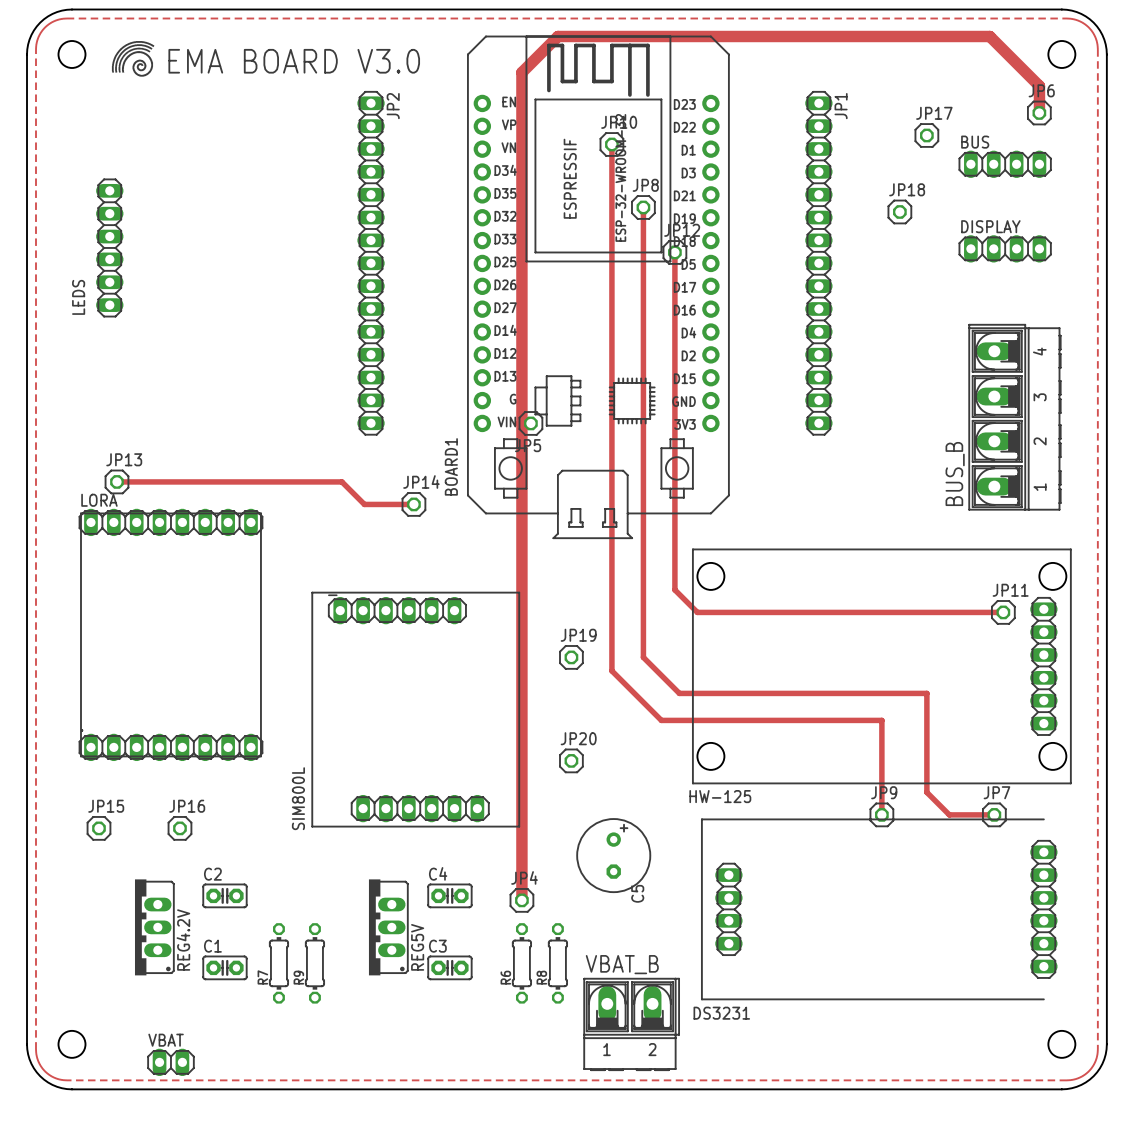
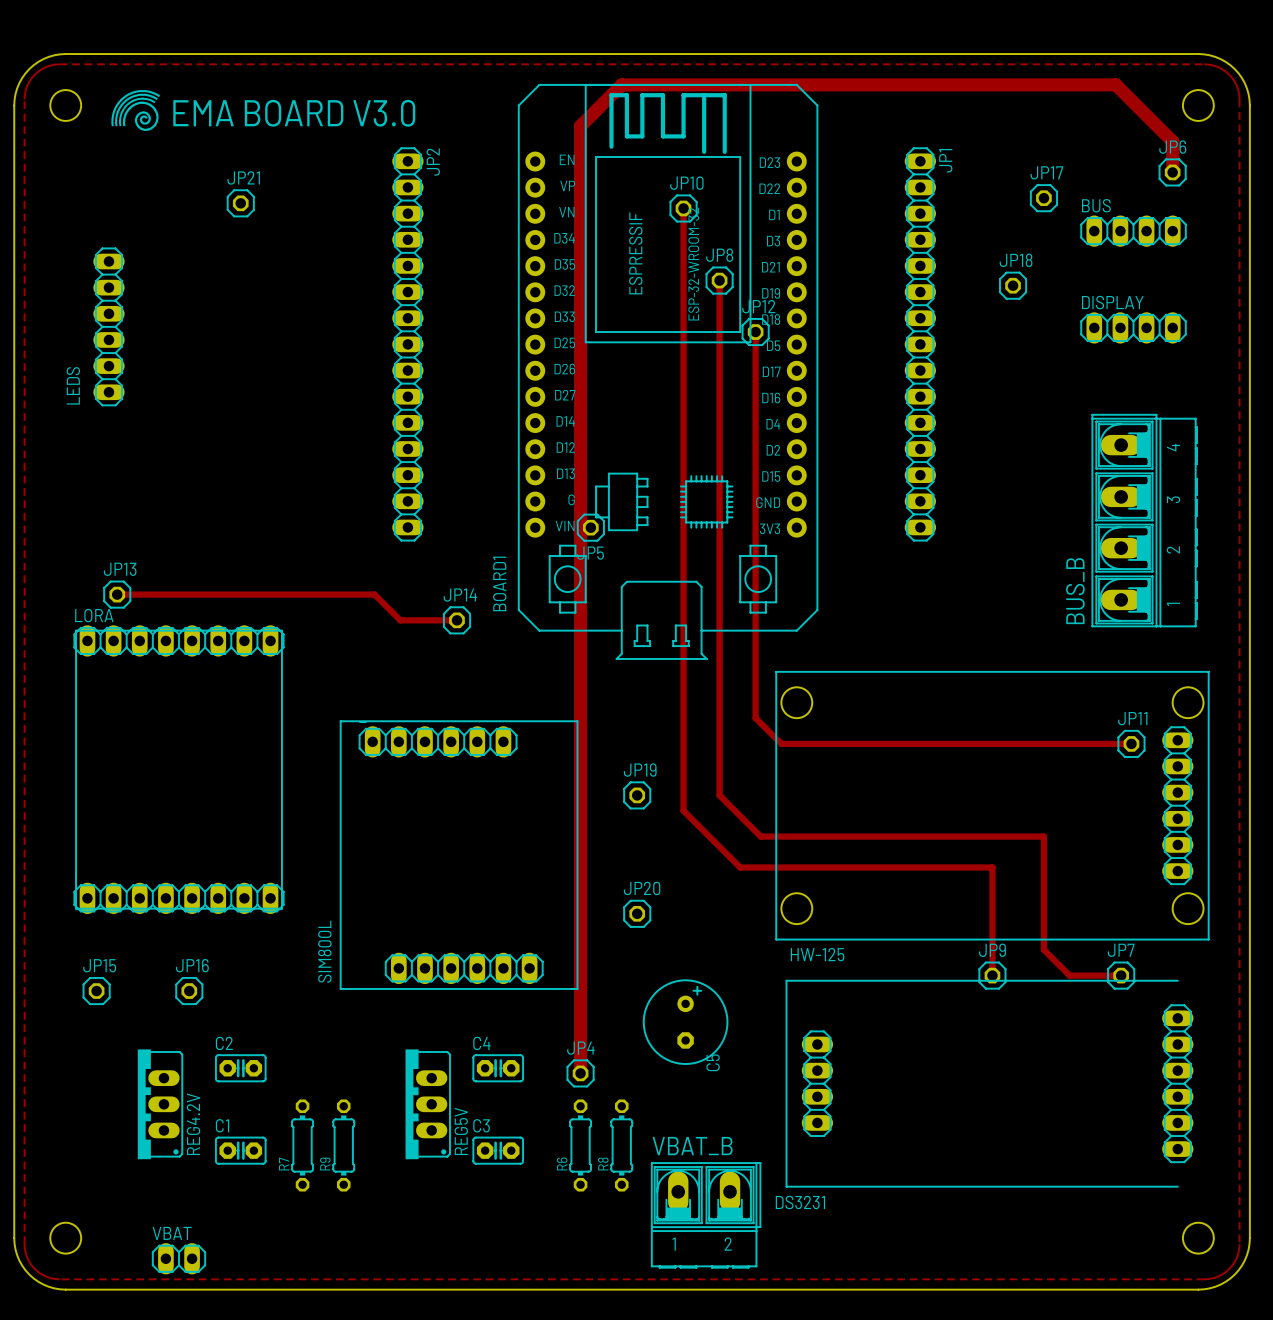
JP21: none -> (240, 203)

